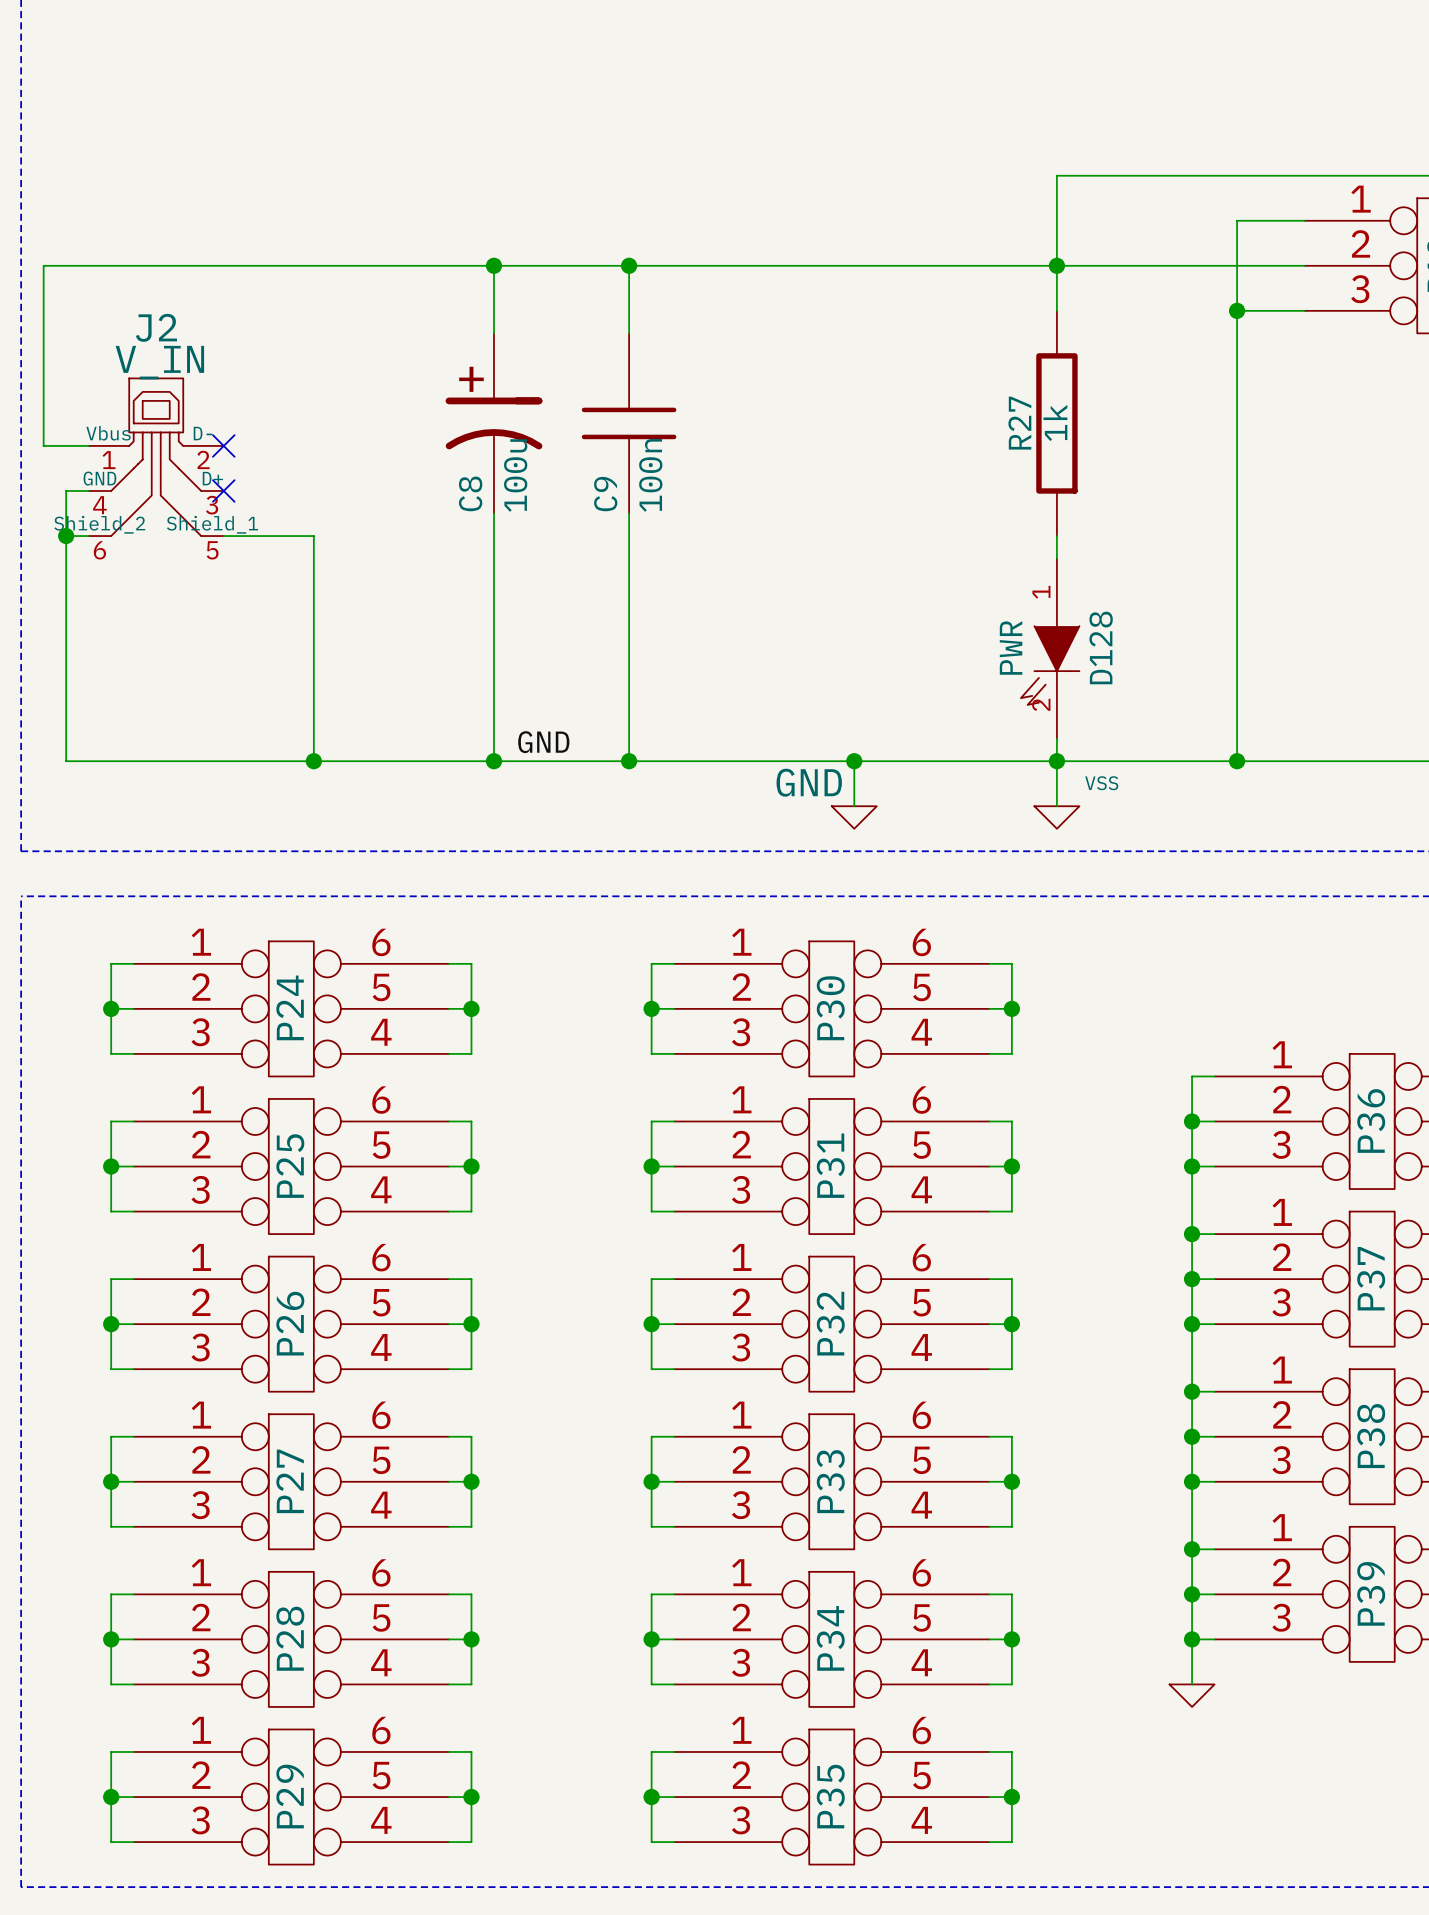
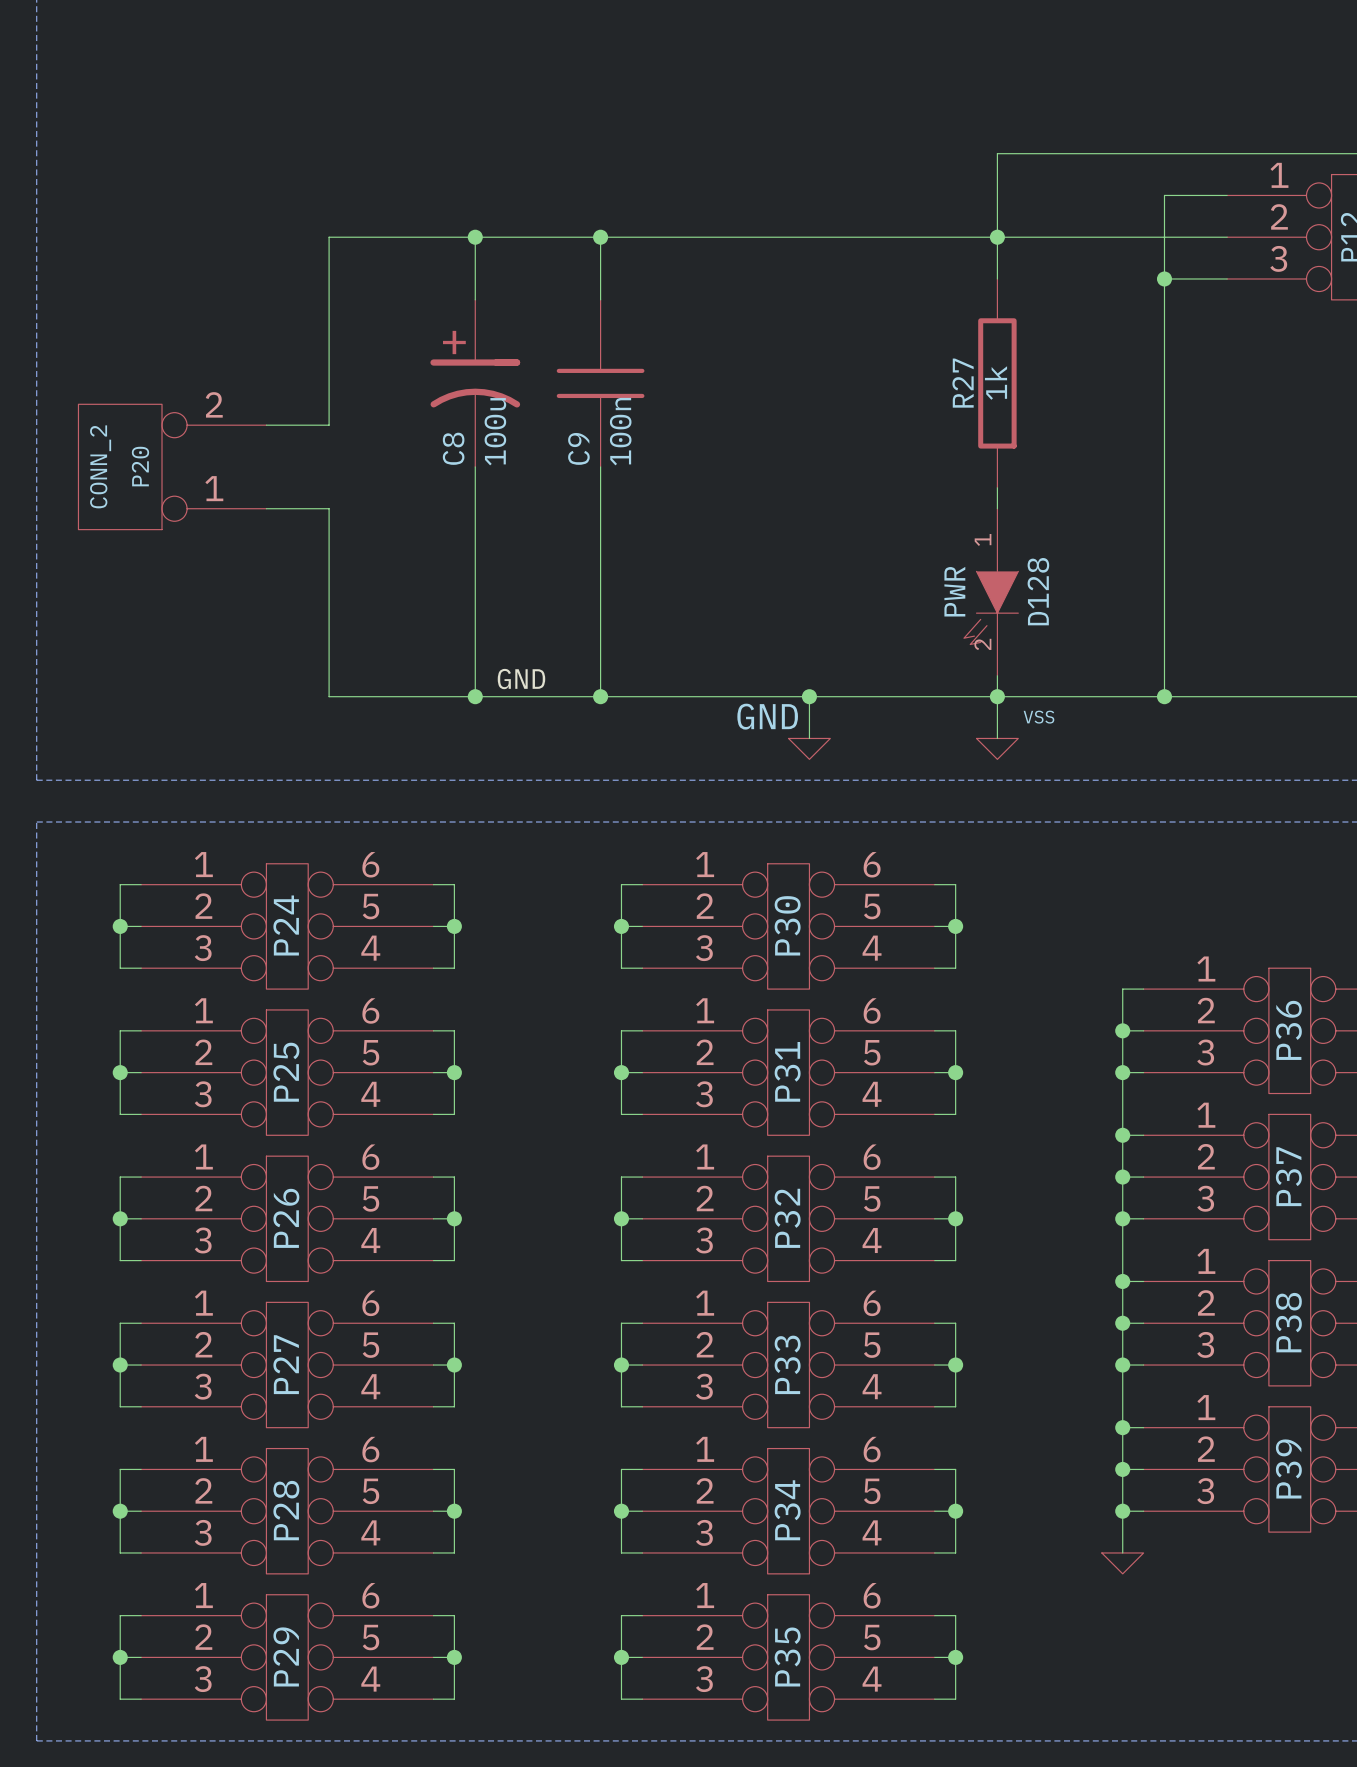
wire: (336, 265) (43, 265) (43, 445) (88, 445) -> (329, 237) (329, 425) (266, 425)
J2: V_IN (156, 434) -> none
no-connect mark: (223, 445) -> none
wire: (88, 490) (66, 490) (66, 761) (336, 761) -> (266, 508) (329, 508) (329, 696)
no-connect mark: (223, 490) -> none
P20: none -> CONN_2 (172, 466)
wire: (66, 536) (88, 536) -> none
junction: (66, 536) -> none
wire: (223, 536) (313, 536) (313, 761) -> none
junction: (313, 761) -> none

